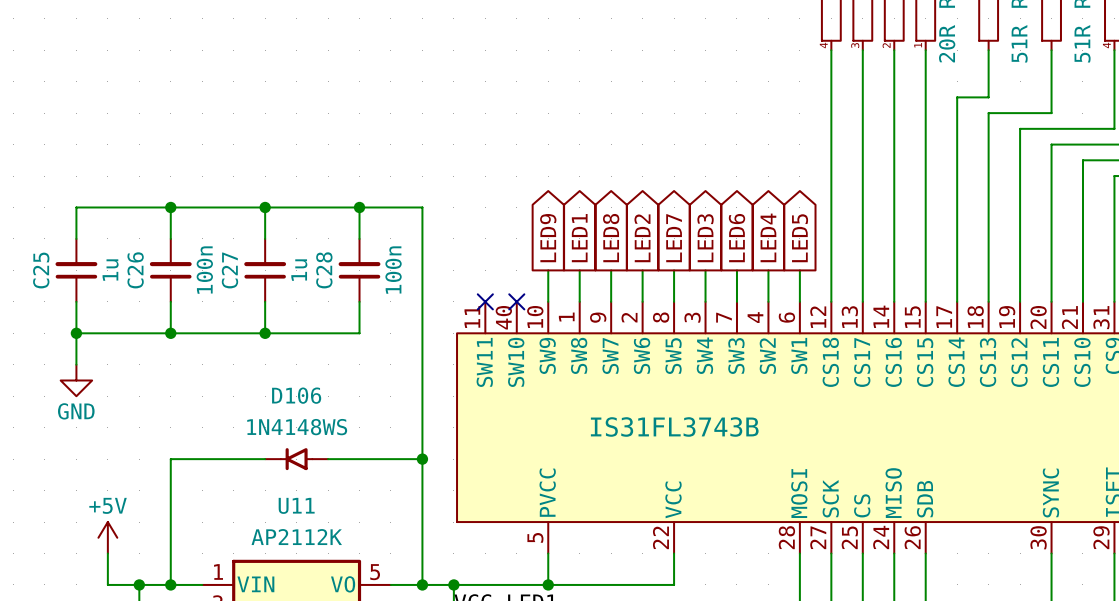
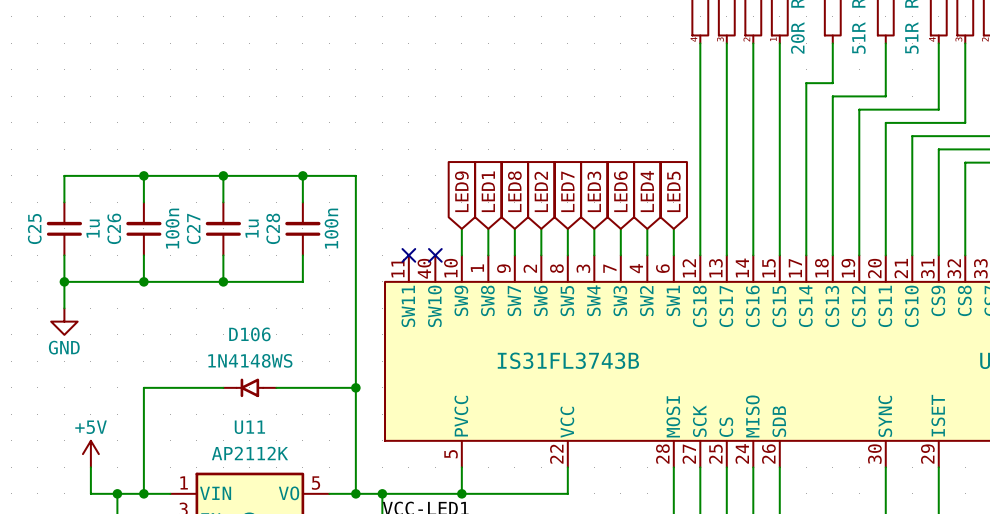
global label shape: output (768, 237) -> input (647, 191)
global label shape: output (548, 238) -> input (461, 191)
global label shape: output (579, 238) -> input (488, 191)
global label shape: output (611, 238) -> input (514, 191)
global label shape: output (642, 238) -> input (541, 191)
global label shape: output (674, 238) -> input (567, 191)
global label shape: output (705, 238) -> input (594, 191)
global label shape: output (736, 238) -> input (620, 191)
global label shape: output (800, 238) -> input (673, 191)

